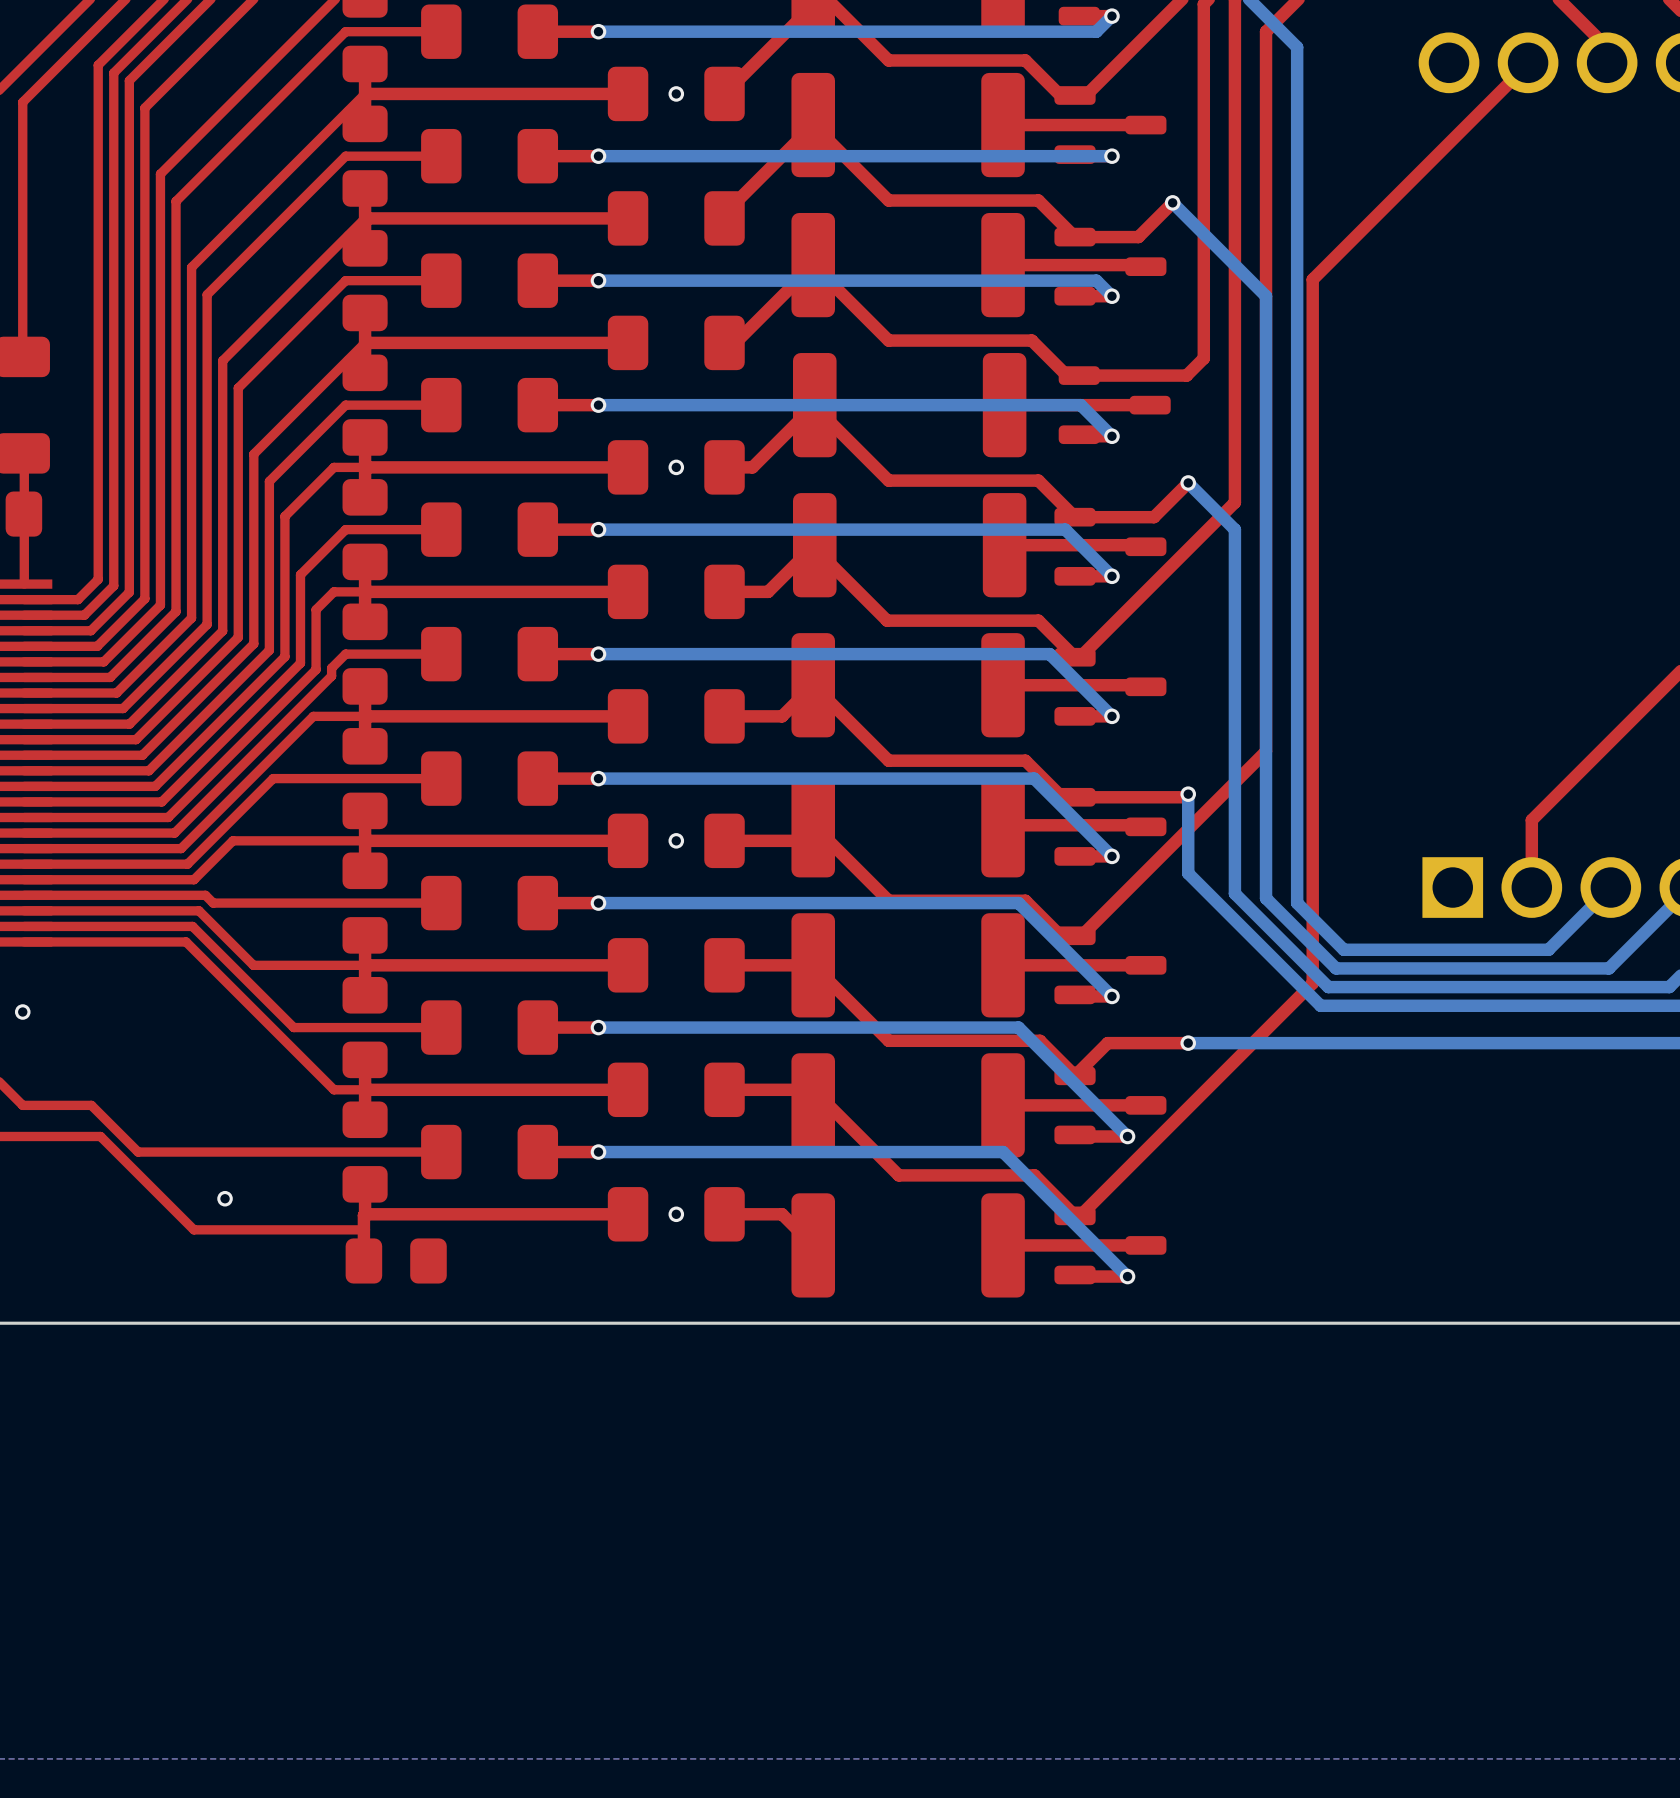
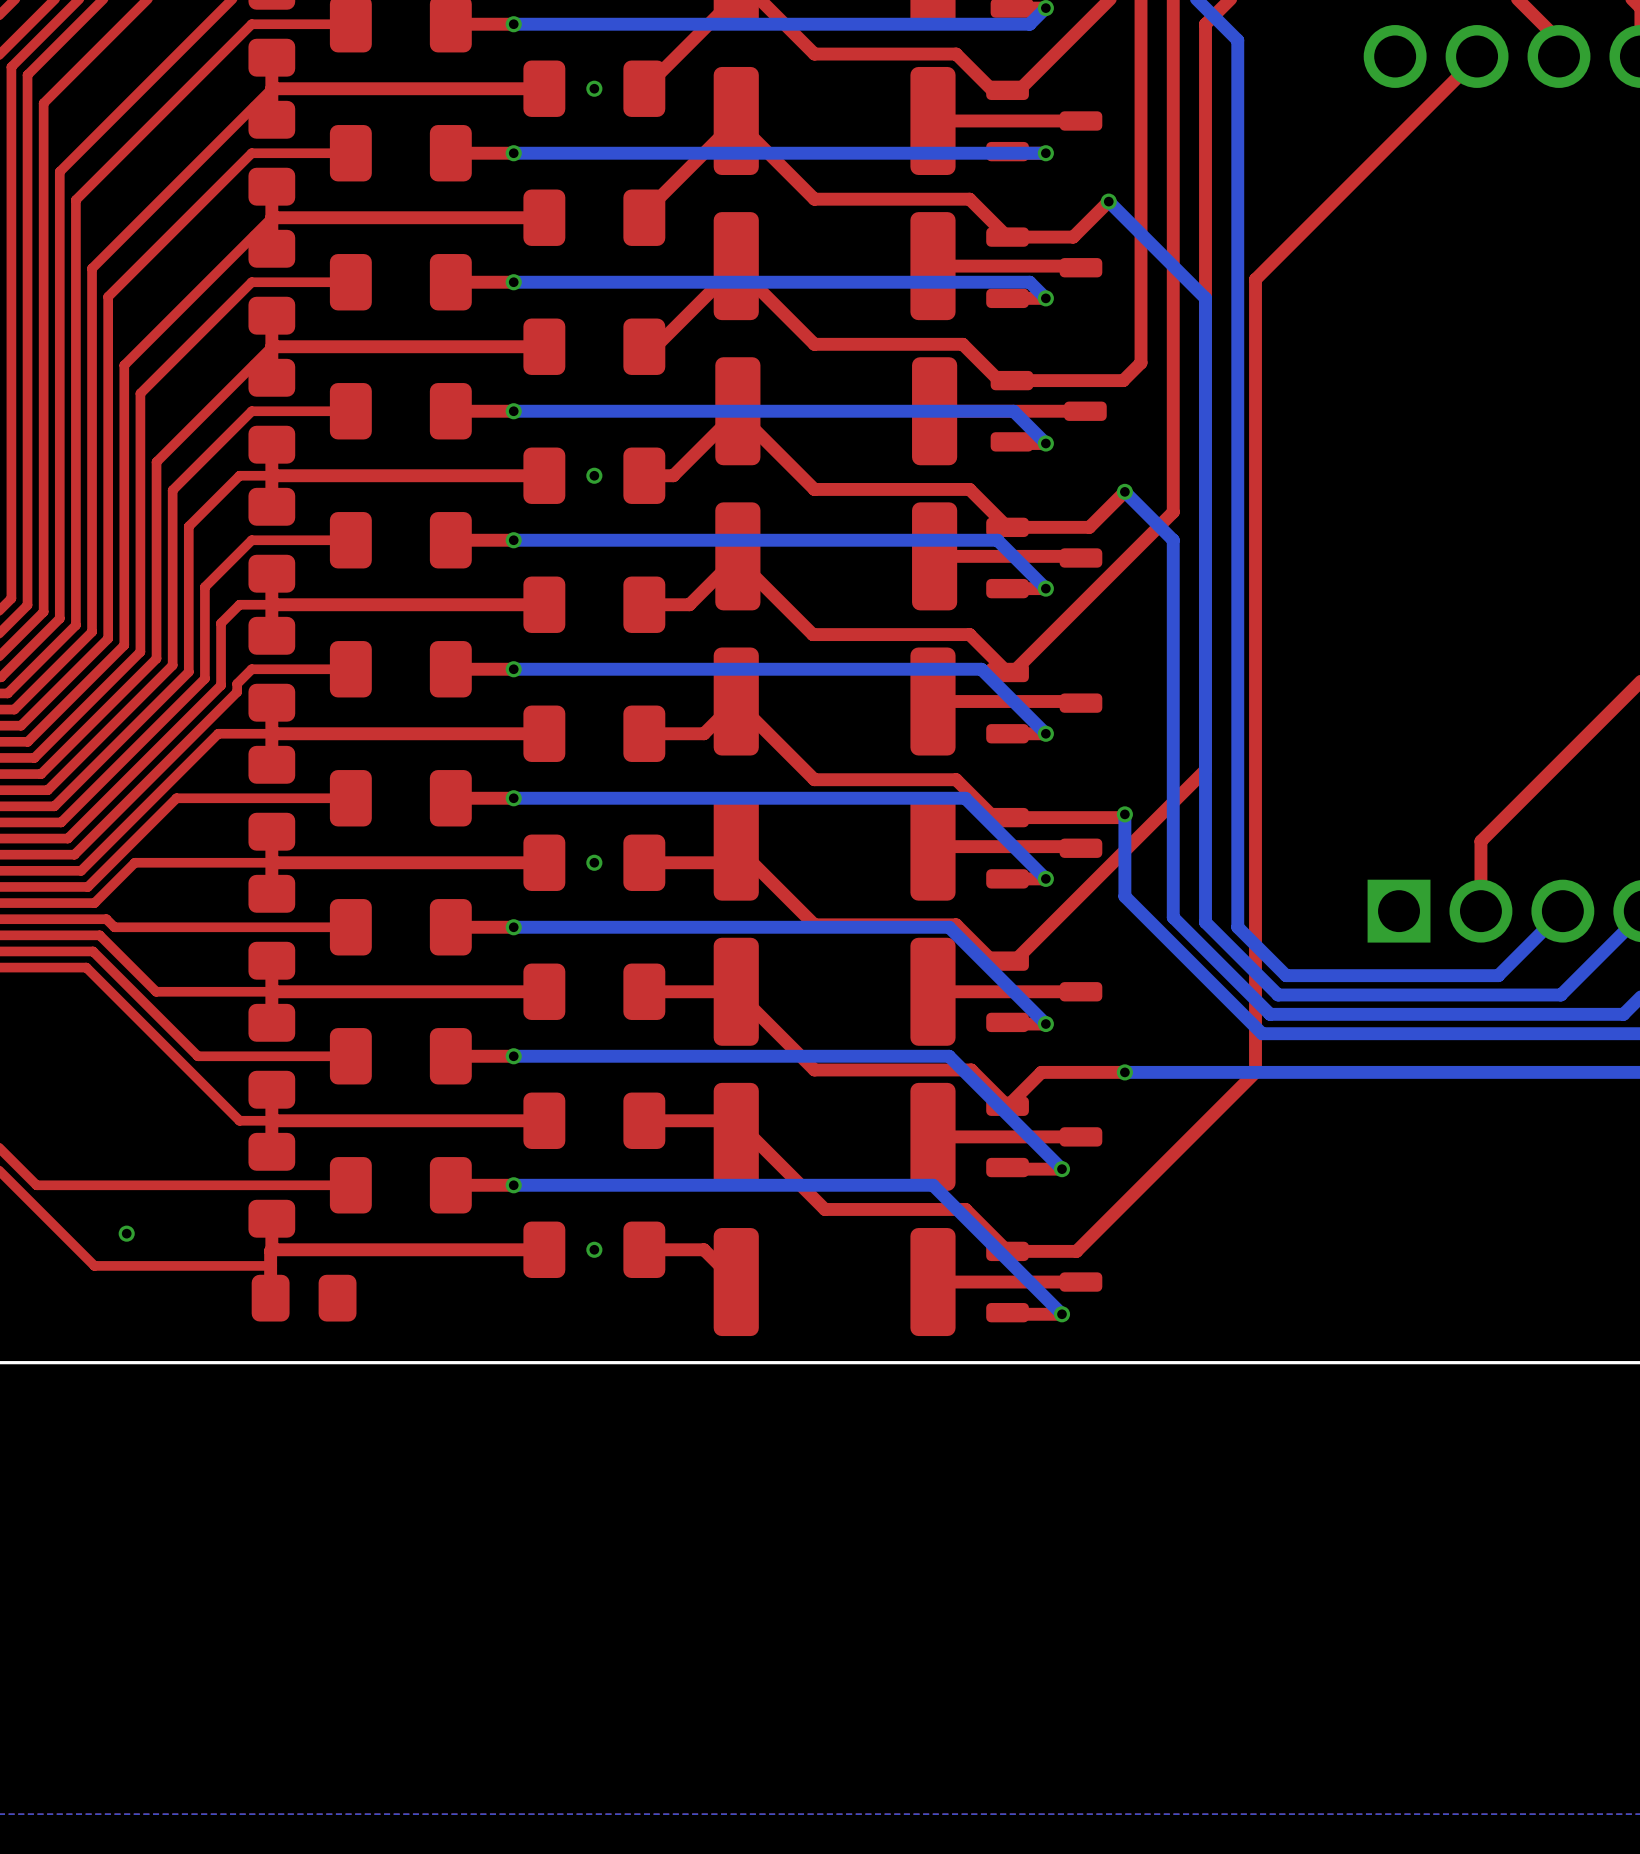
top track: (1314, 278) (1312, 279) (1312, 983) (1080, 1215) -> (1255, 279) (1255, 1072) (1076, 1251) (1012, 1251)

